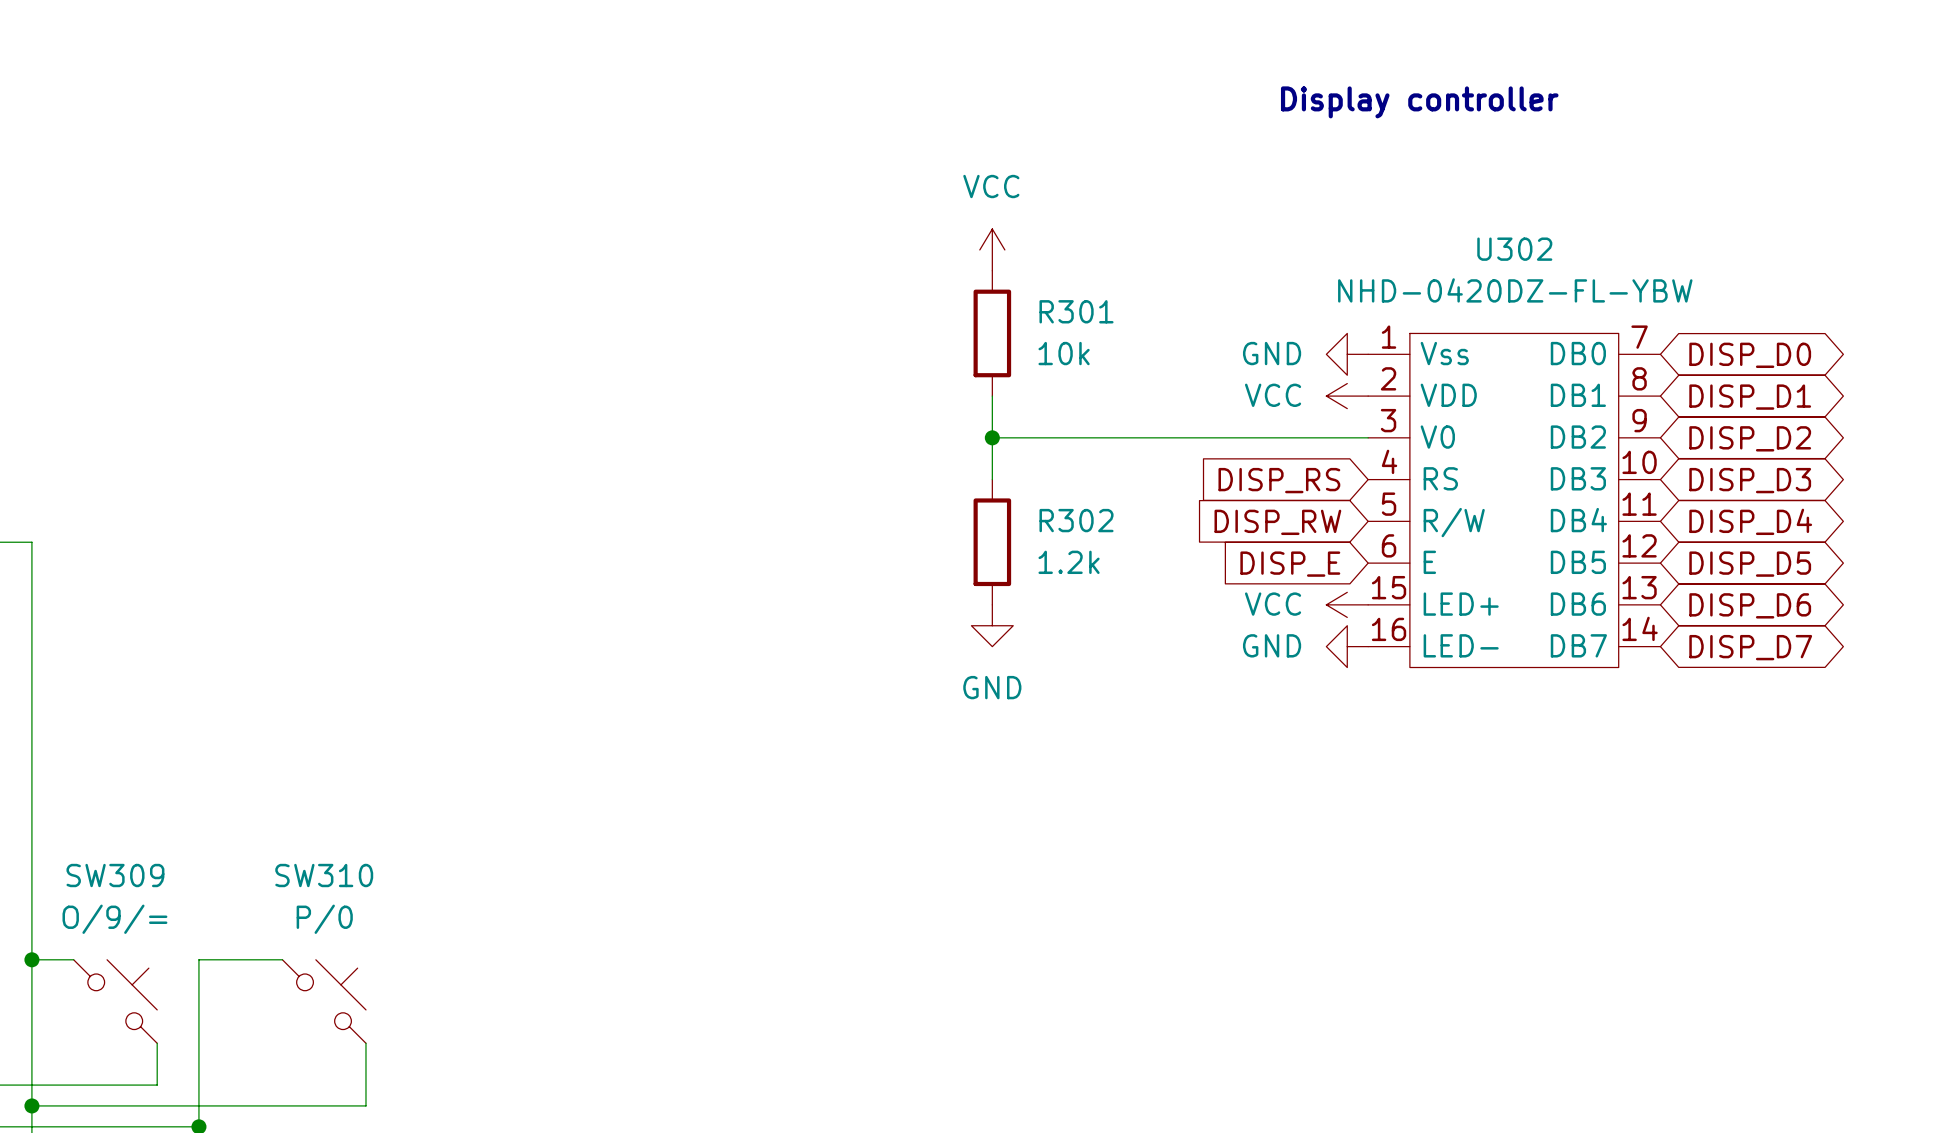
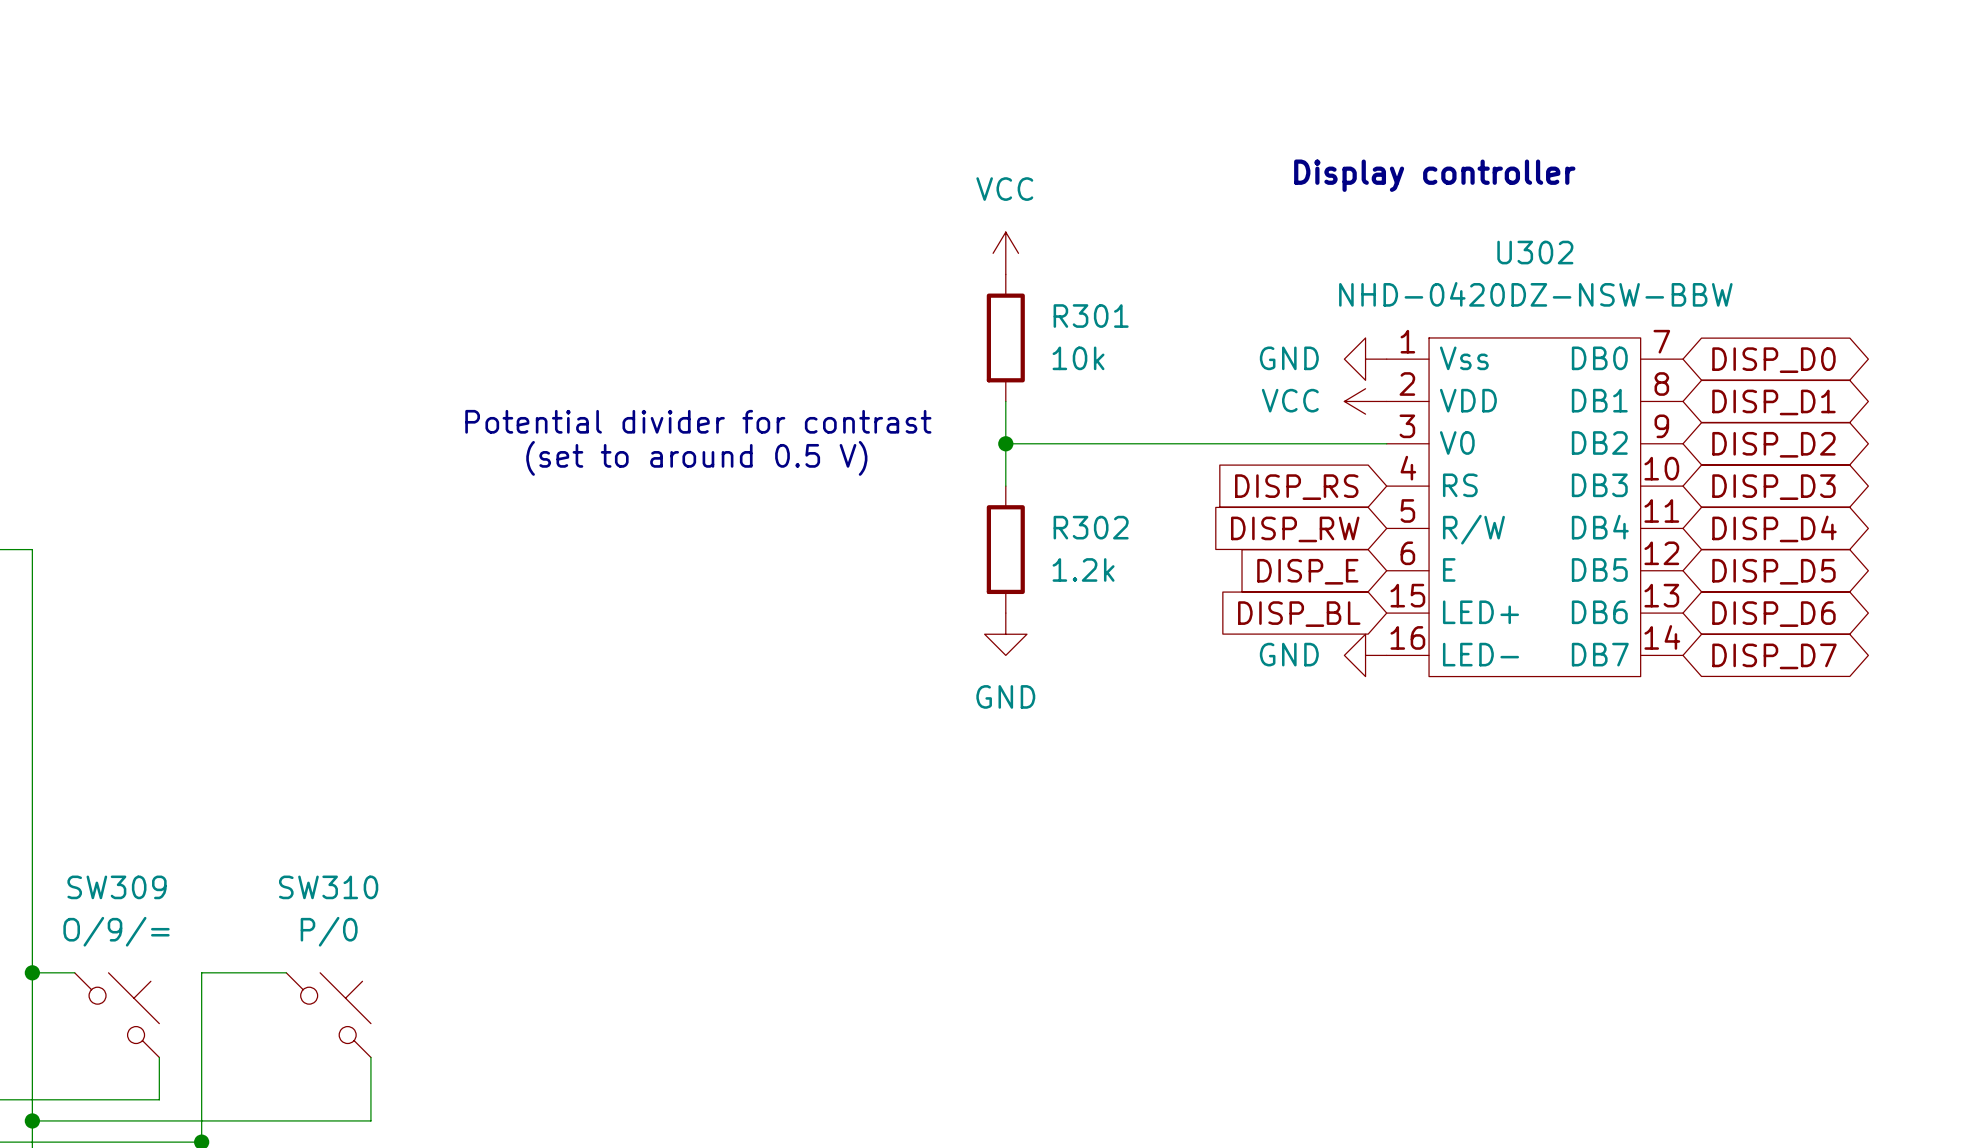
text position: Display controller (1419, 102) -> Display controller (1434, 175)
U302 value: NHD-0420DZ-FL-YBW (1515, 290) -> NHD-0420DZ-NSW-BBW (1535, 294)
text: none -> Potential divider for contrast (698, 421)
text: none -> (set to around 0.5 V) (696, 458)
power symbol: VCC (1347, 604) -> none
global label: none -> DISP_BL (1299, 614)

